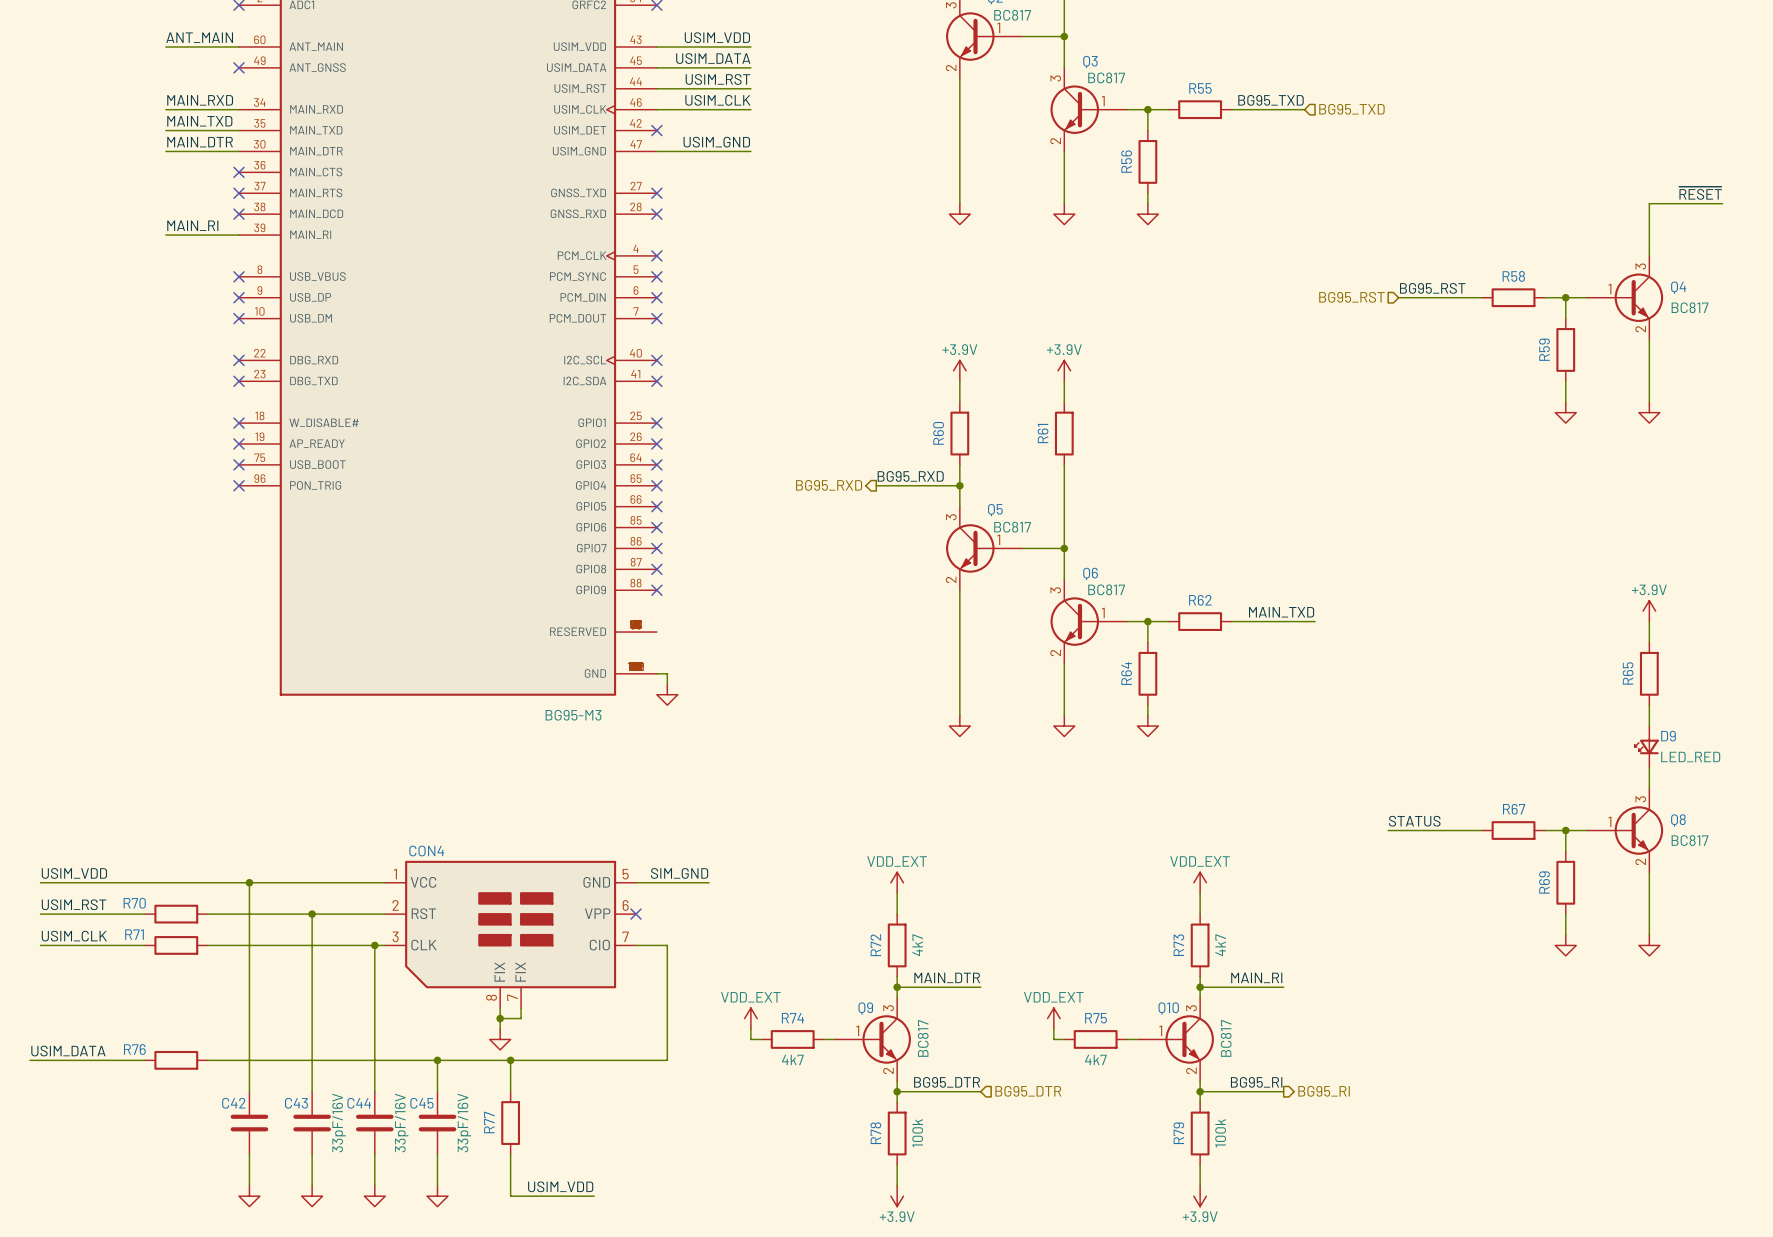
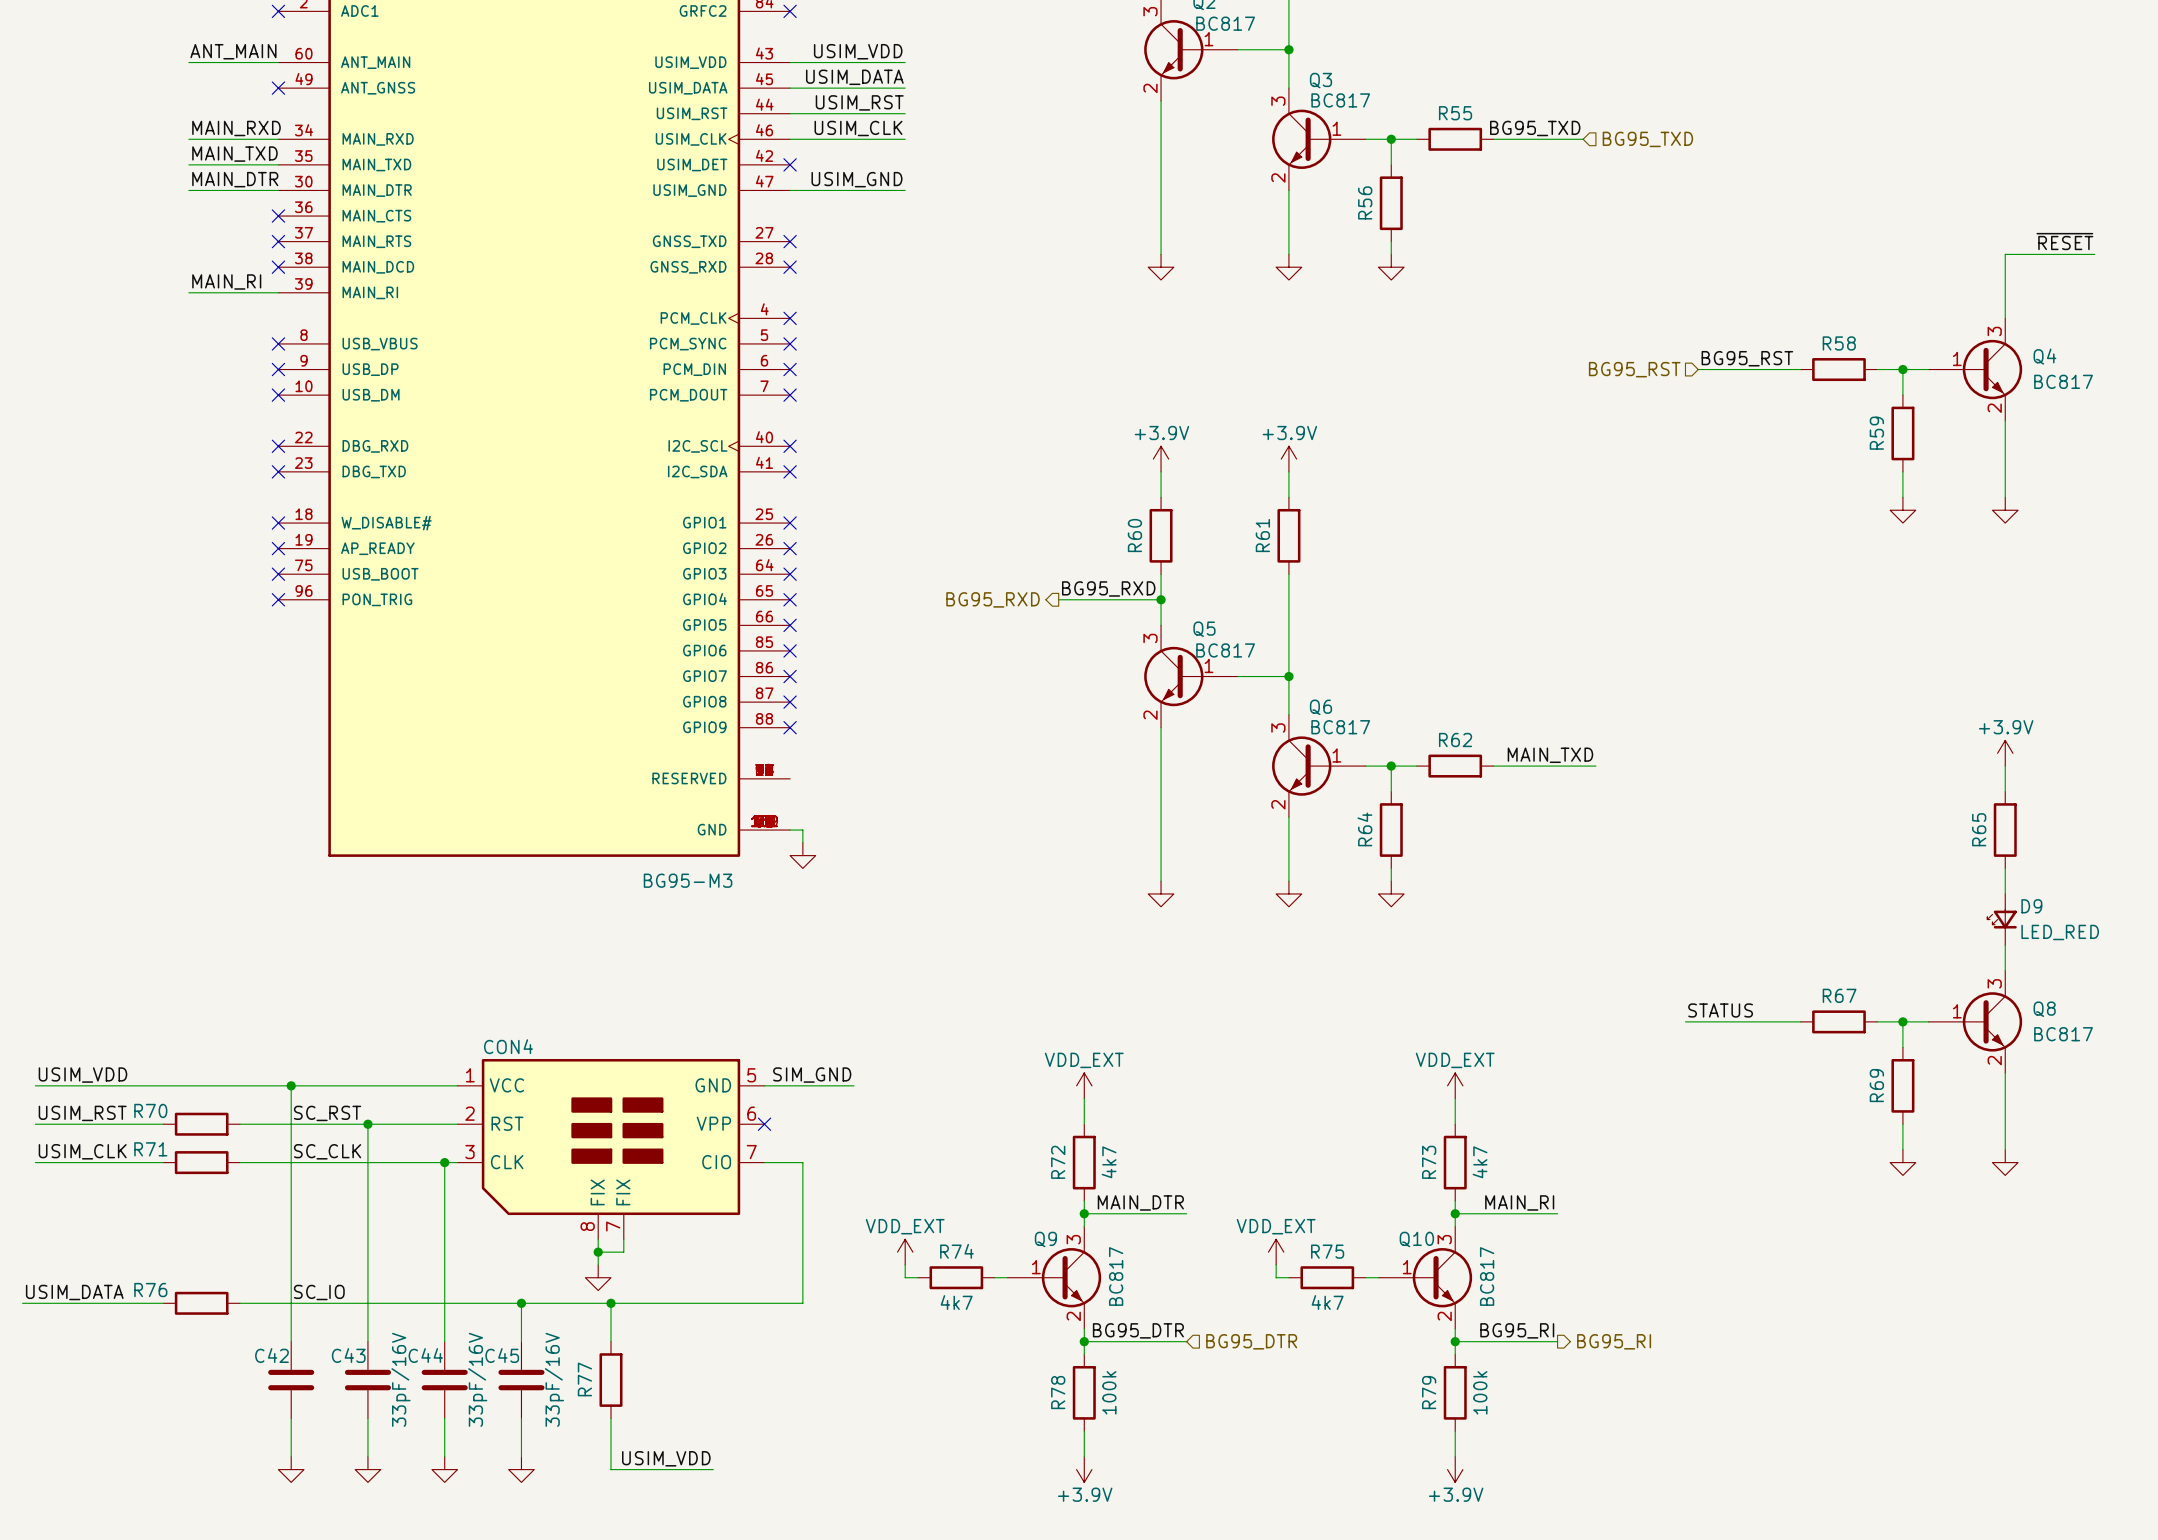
label: none -> SC_RST (327, 1113)
label: none -> SC_CLK (327, 1151)
label: none -> SC_IO (319, 1292)

